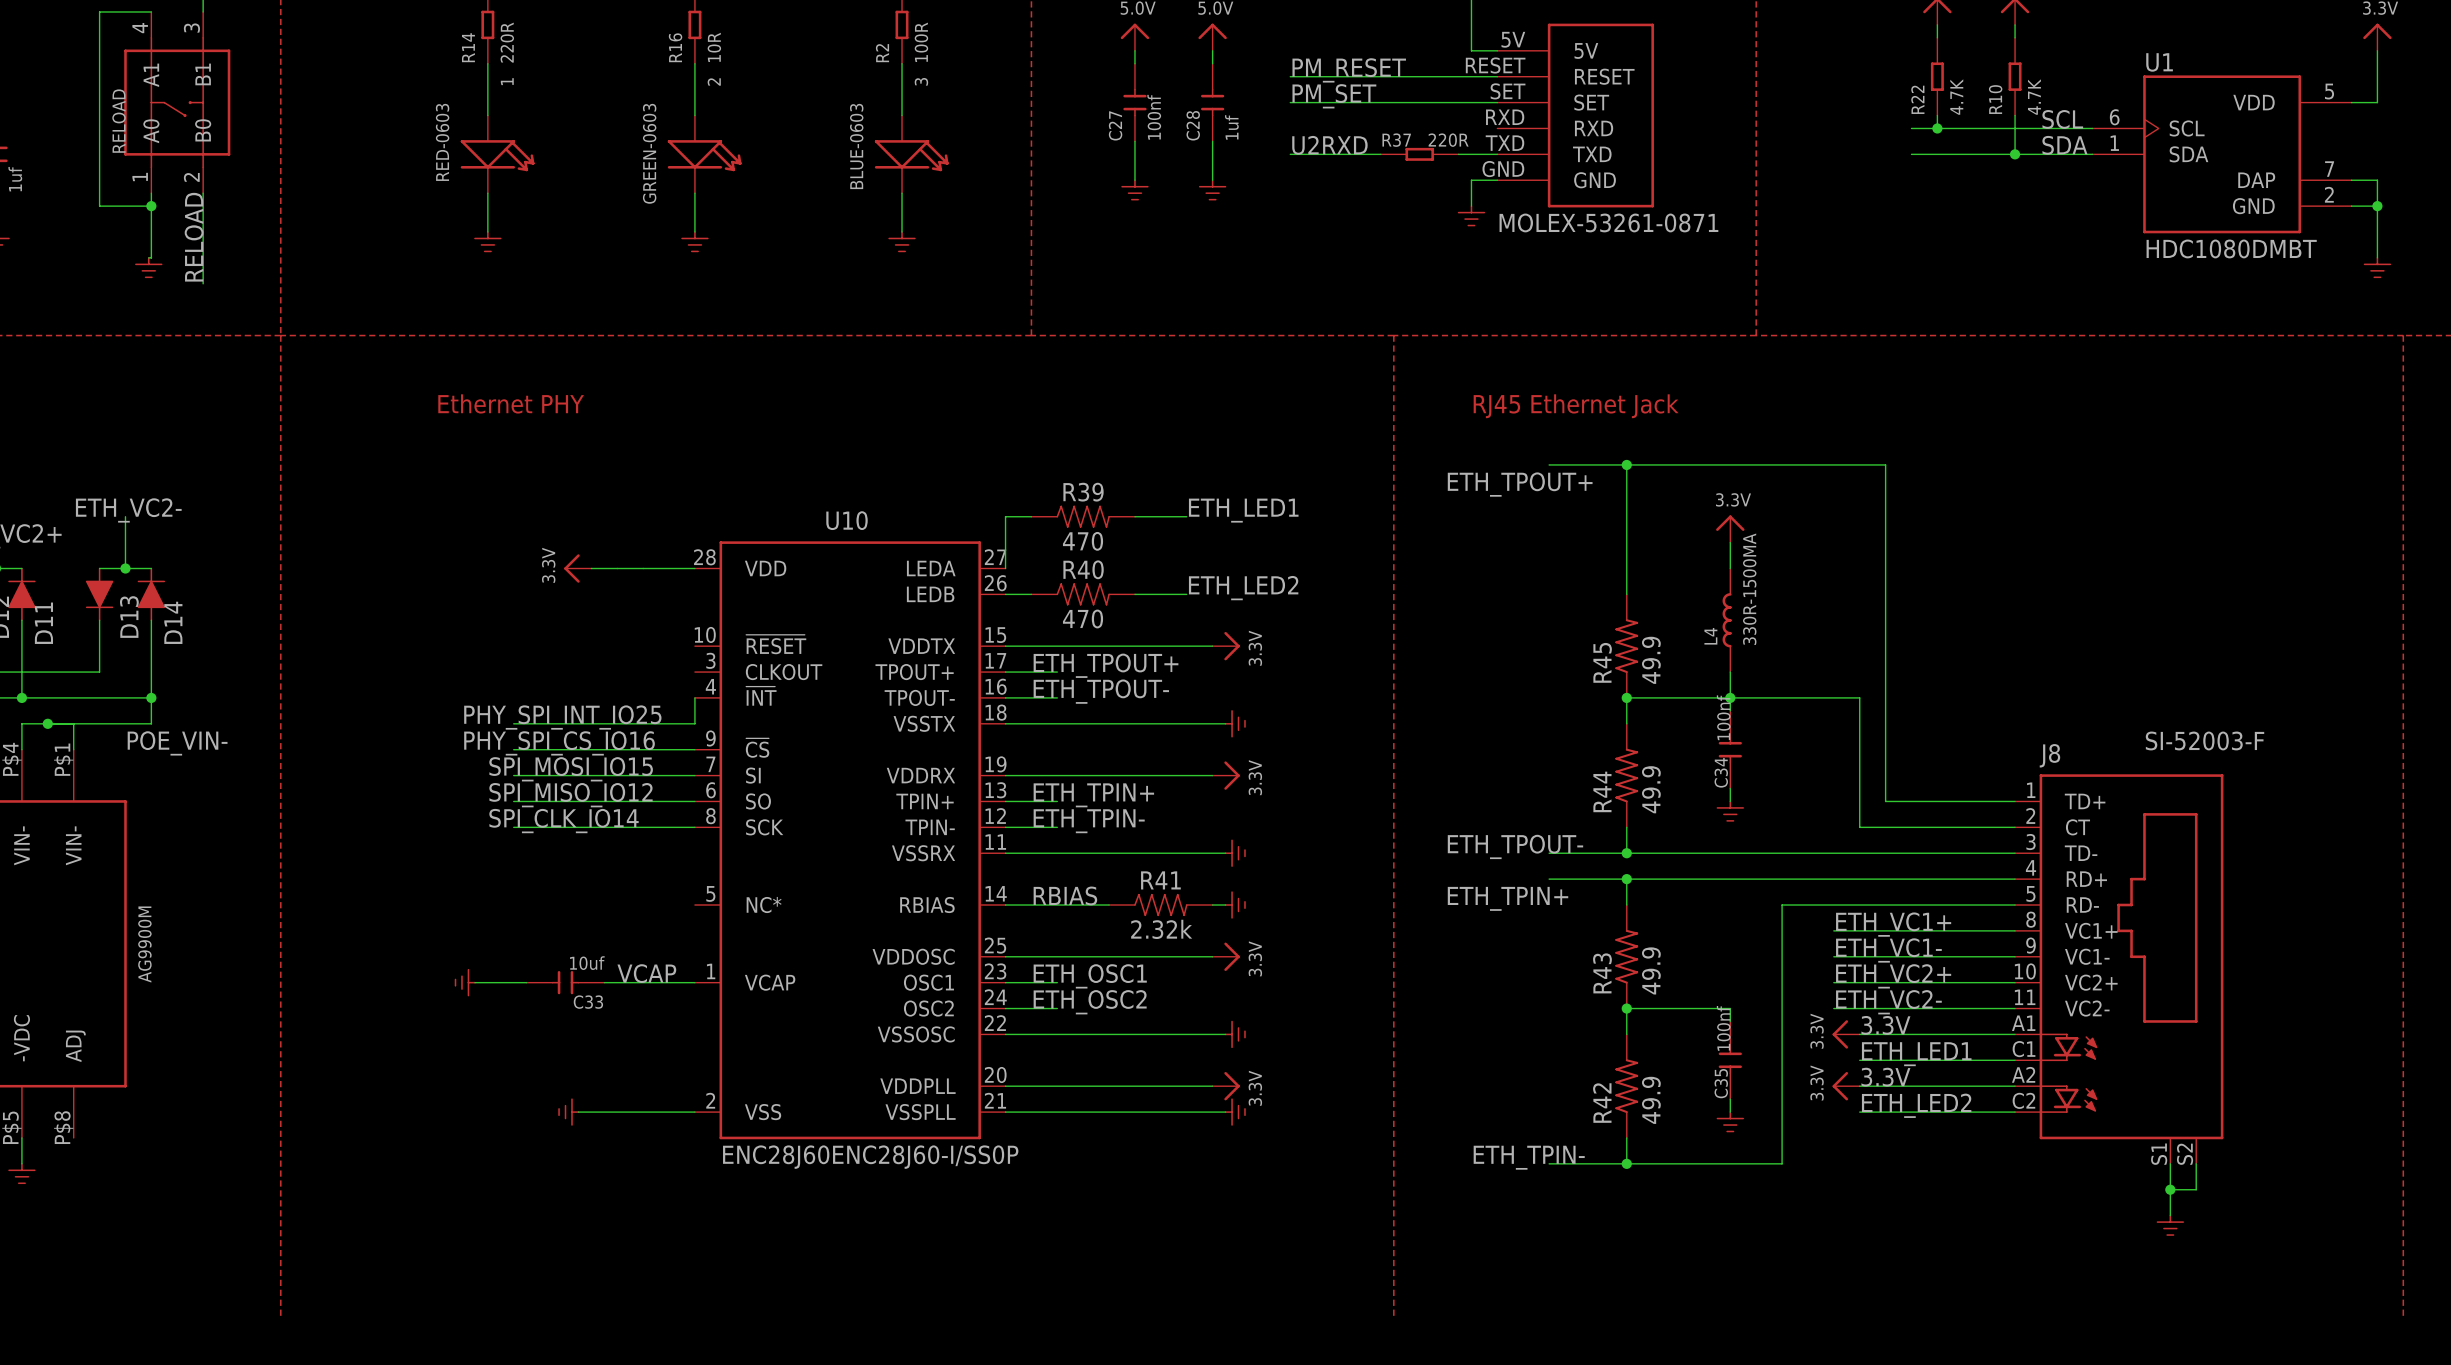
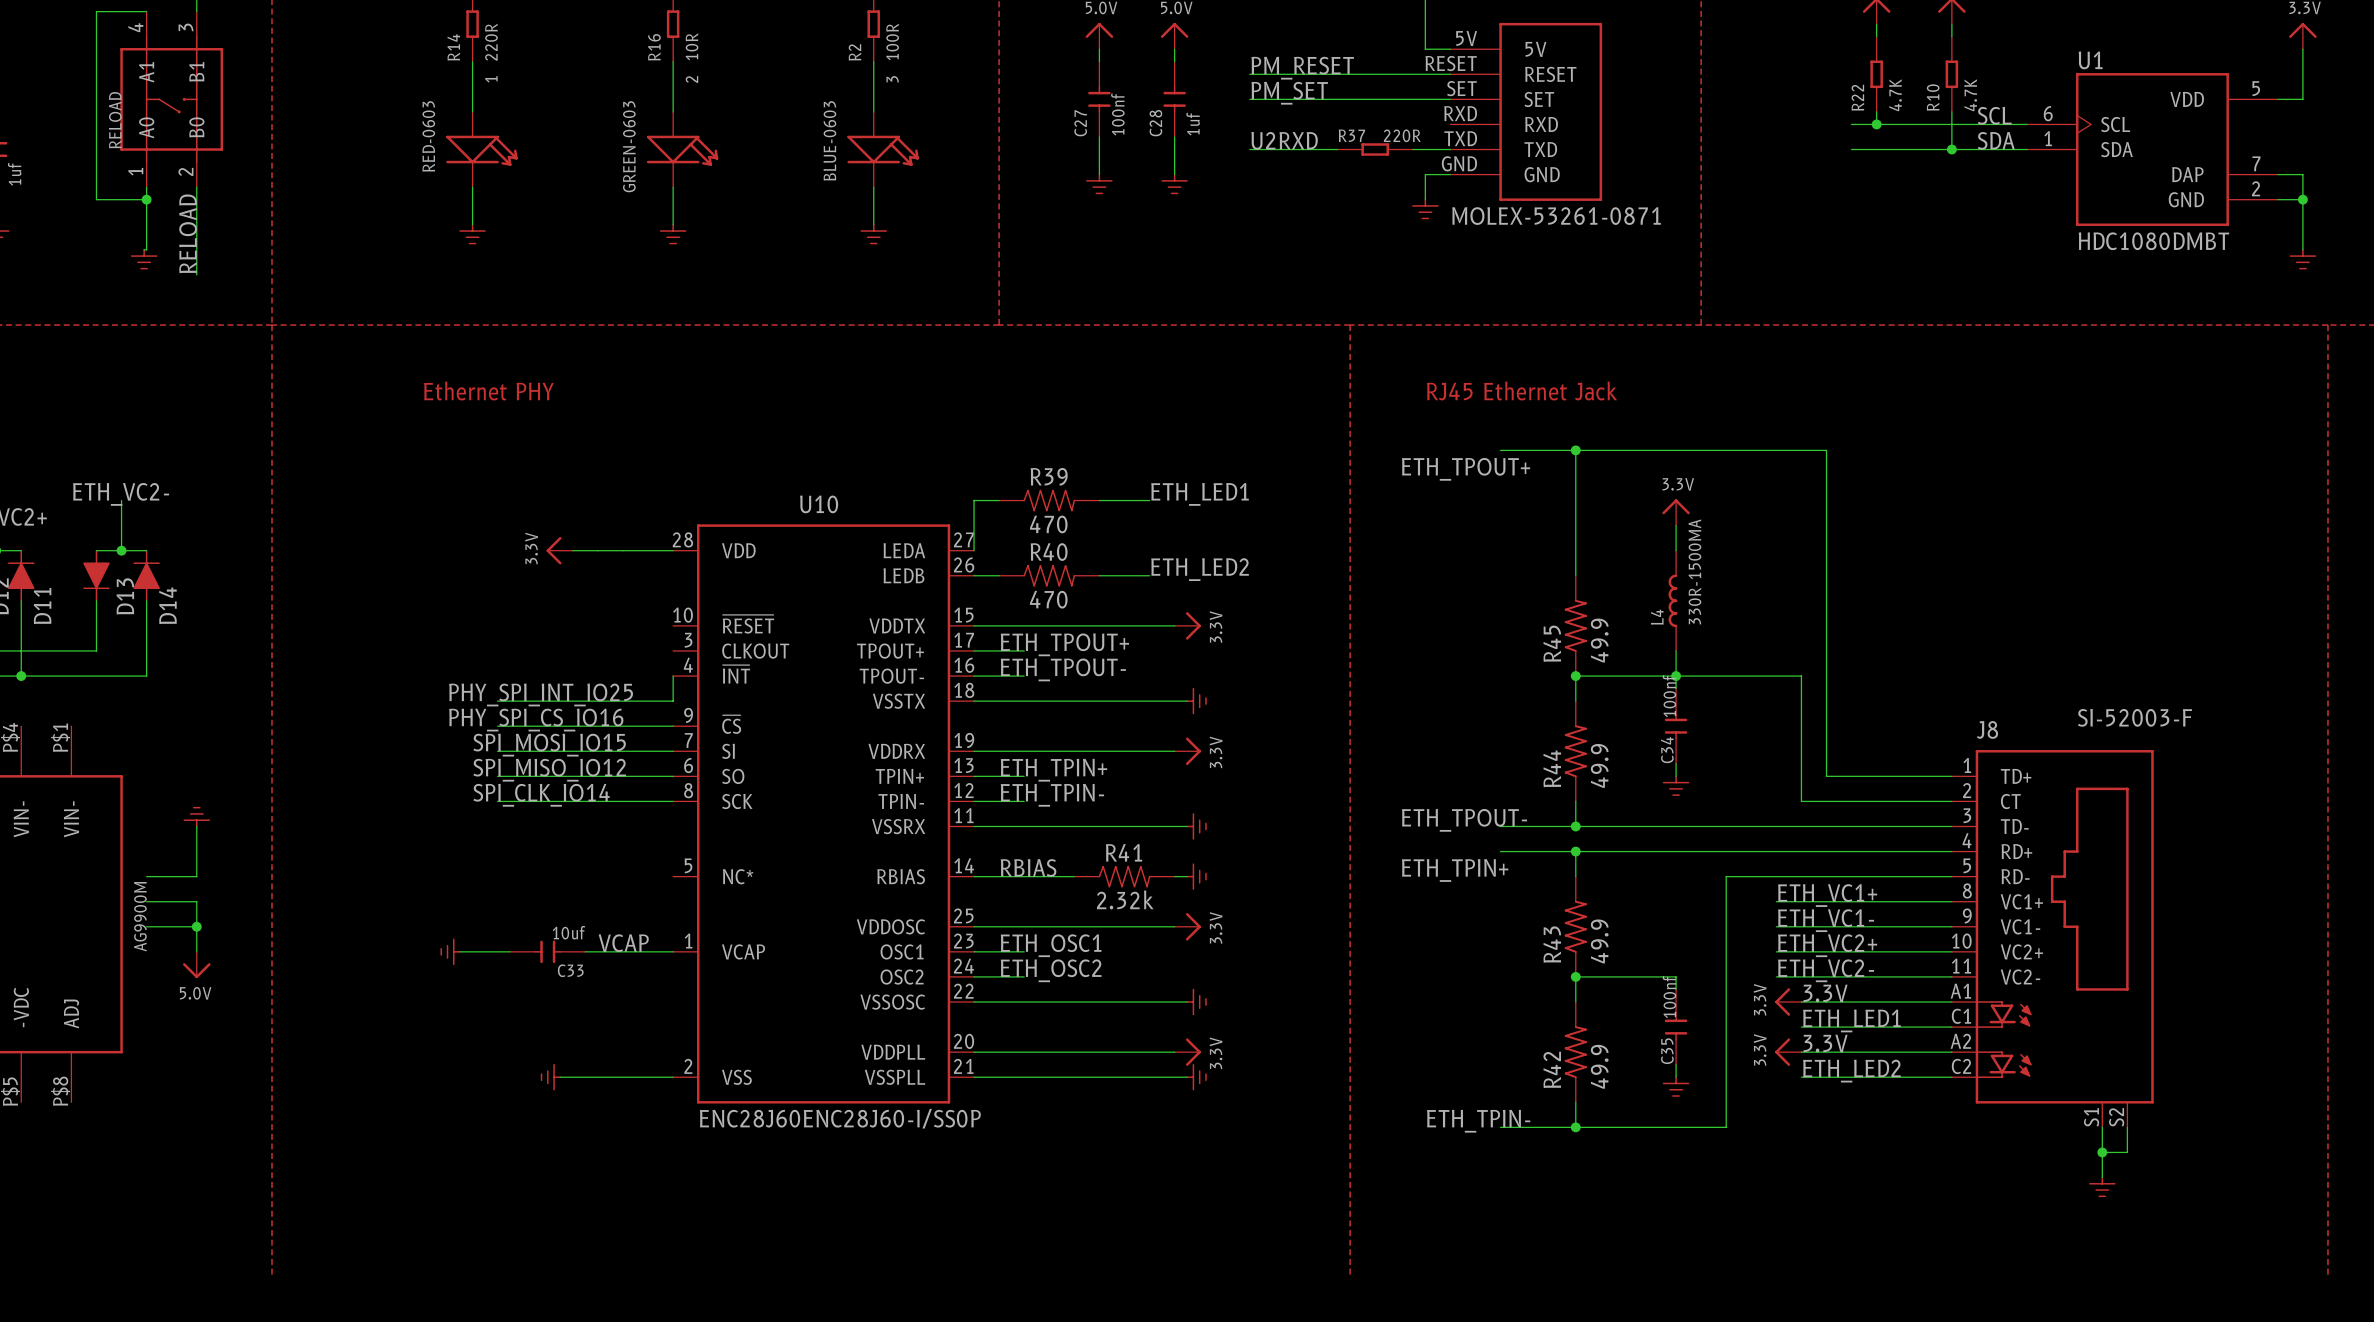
wire: (151, 697) (151, 723) (21, 723) (21, 749) -> none
junction: (151, 697) -> none
junction: (47, 723) -> none
wire: (73, 723) (73, 749) -> none
label: POE_VIN- (177, 743) -> none
power symbol: none -> (196, 817)
wire: none -> (196, 826) (196, 876) (146, 876)
wire: none -> (146, 901) (196, 901) (196, 951)
wire: none -> (146, 926) (196, 926)
junction: none -> (196, 926)
power symbol: none -> 5.0V (196, 965)
wire: (21, 1137) (21, 1163) -> none
power symbol: (21, 1173) -> none

